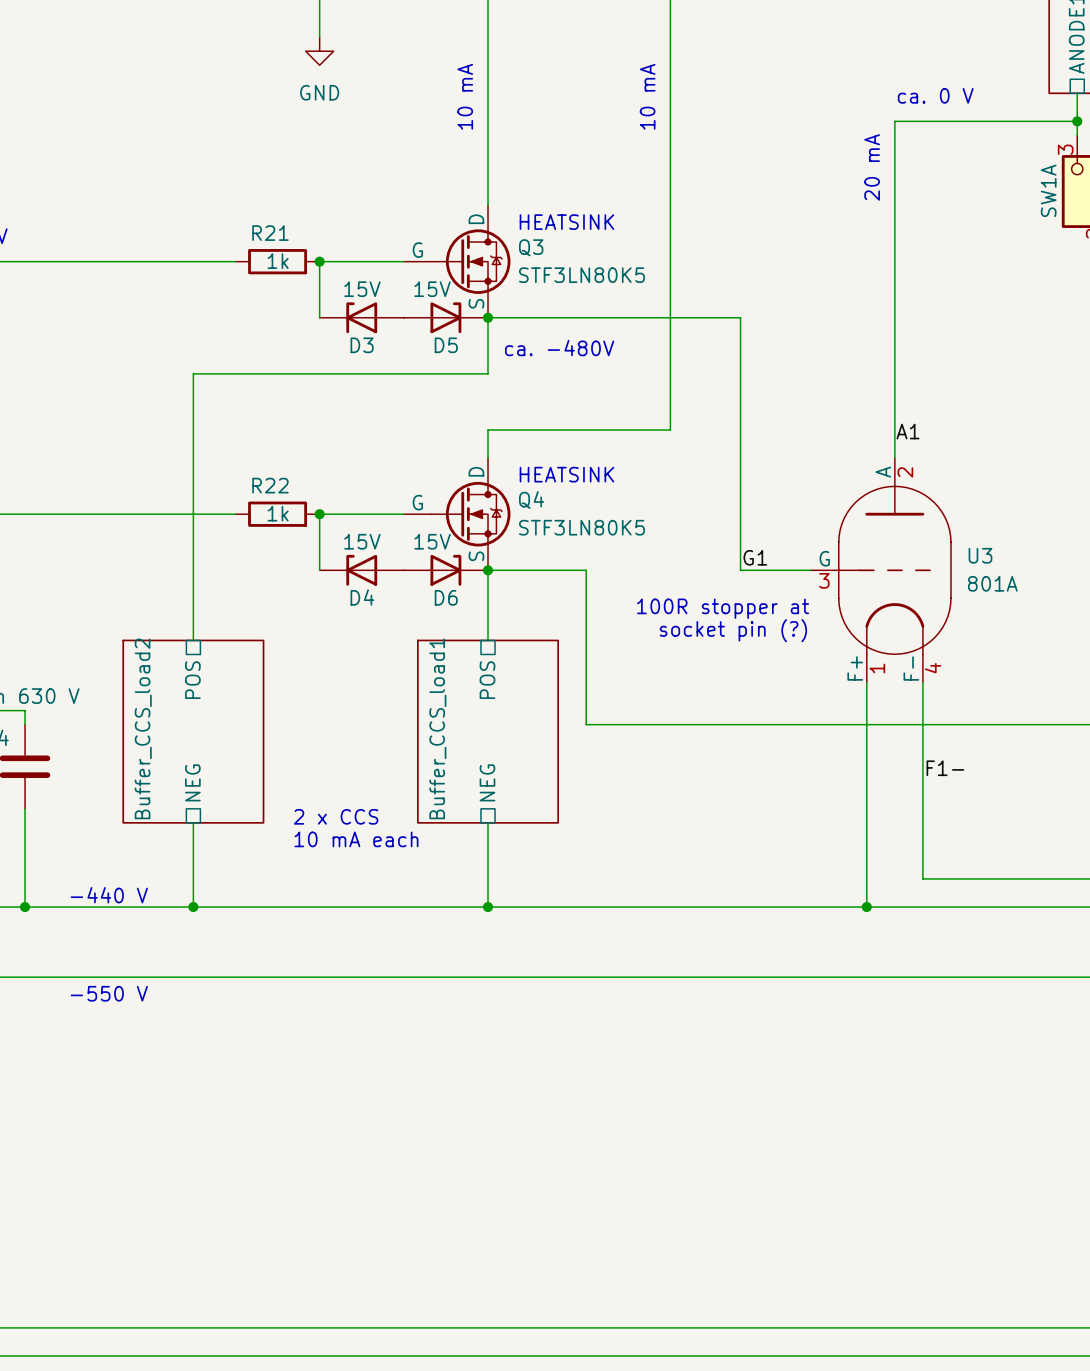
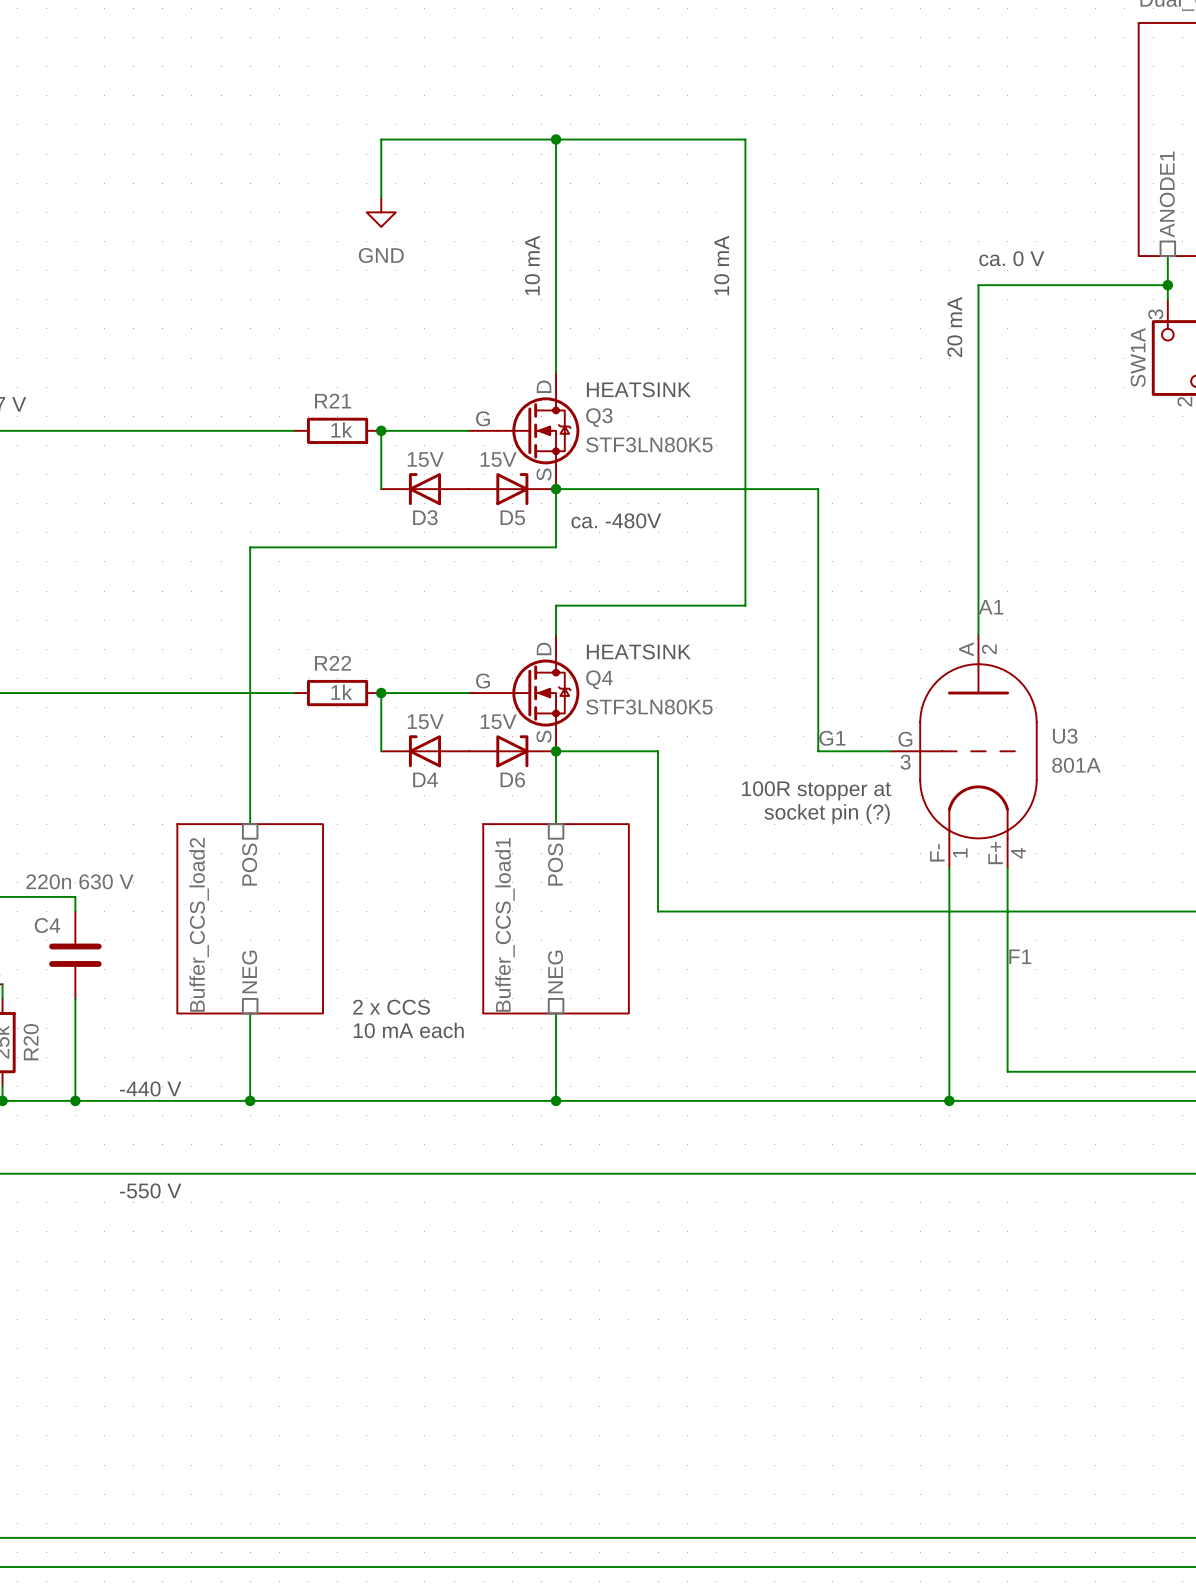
U3 pin name: F+ (855, 668) -> F- (937, 852)
U3 pin name: F- (911, 668) -> F+ (995, 852)
label: F1- (945, 768) -> F1 (1020, 956)

